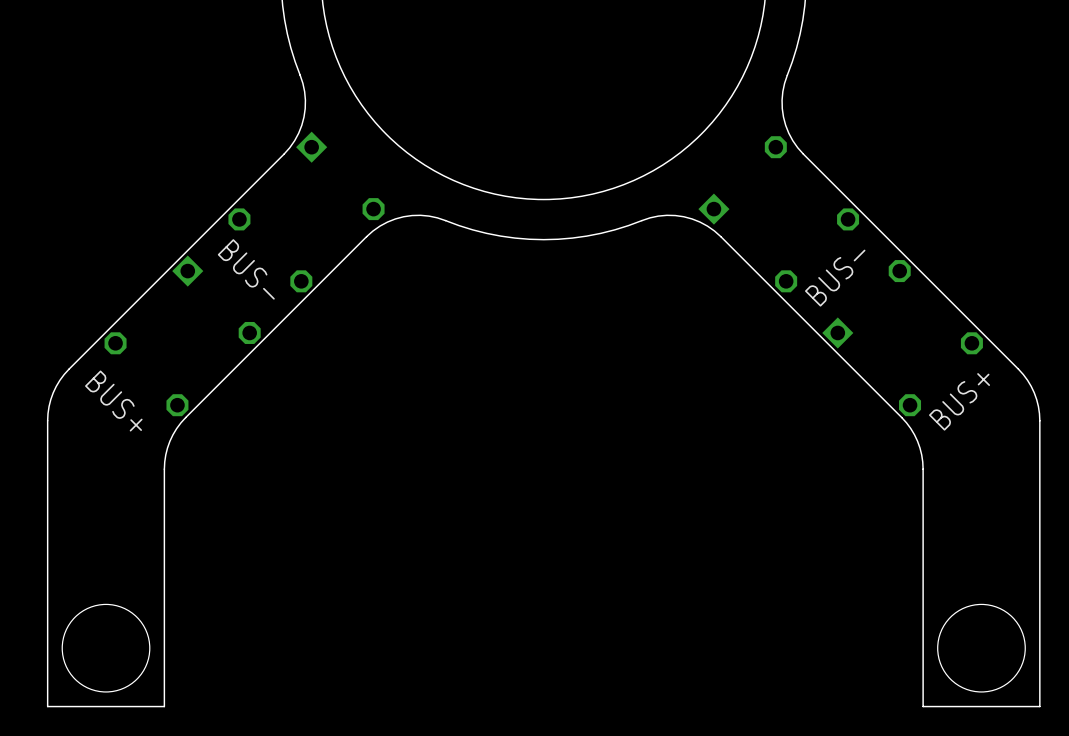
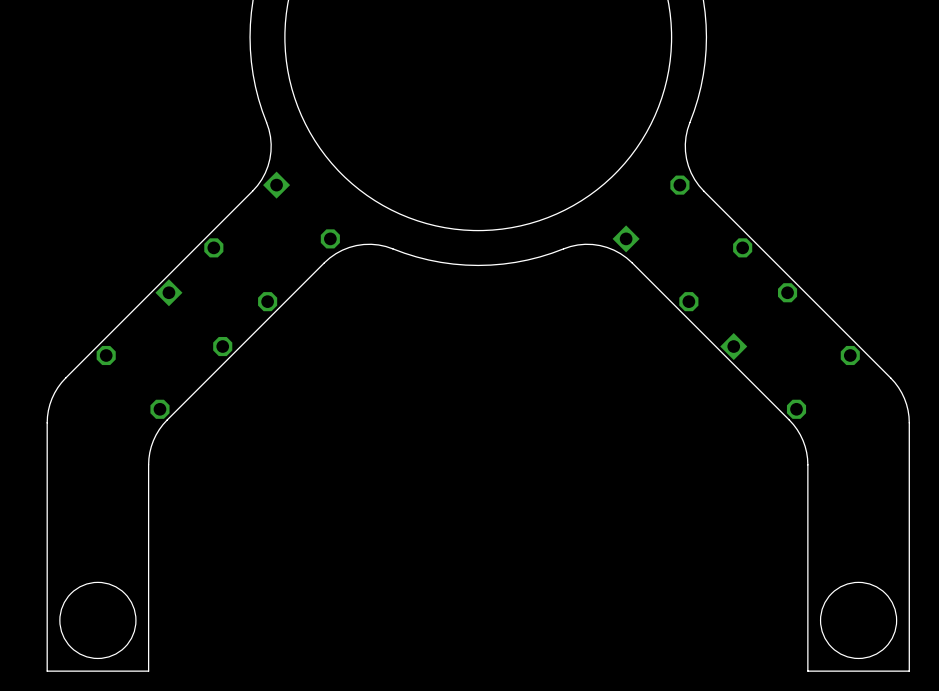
text: BUS- (246, 269) -> none
text: BUS- (835, 278) -> none
text: BUS+ (113, 401) -> none
text: BUS+ (959, 401) -> none

